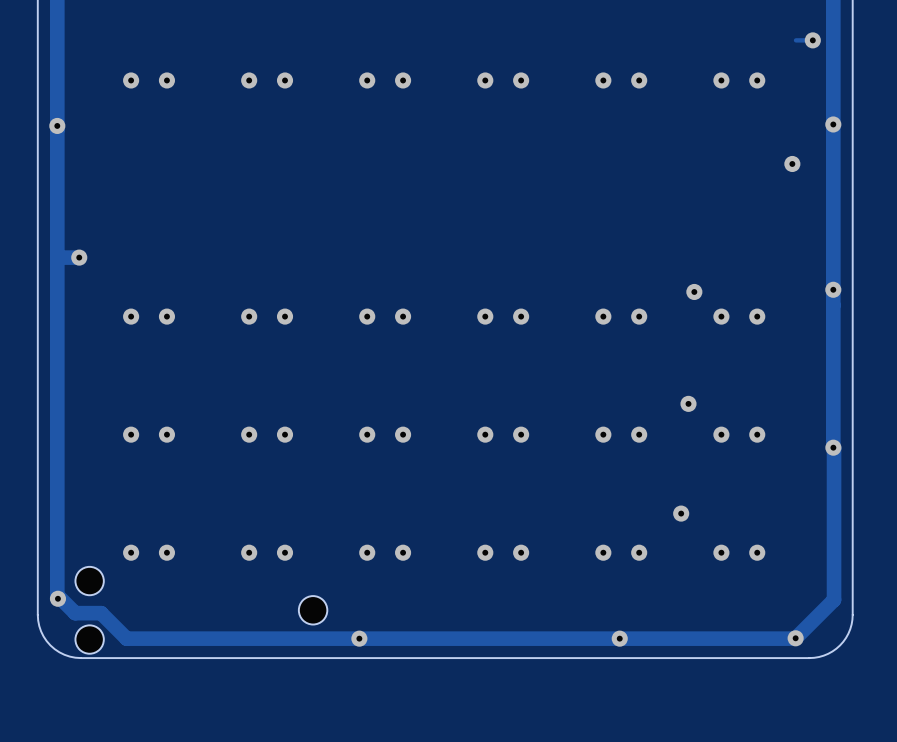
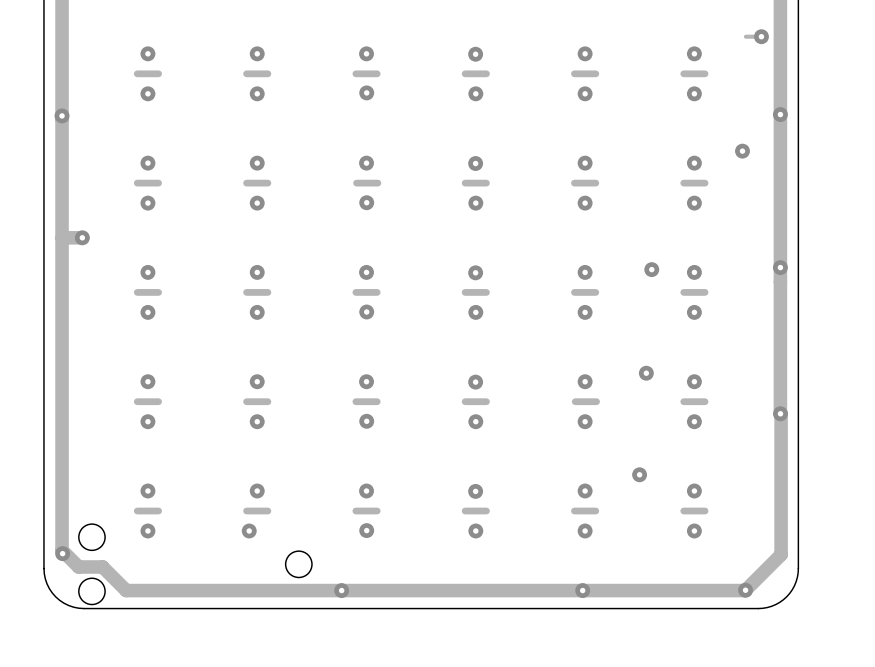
via: none -> (147, 53)
via: none -> (257, 53)
via: none -> (366, 53)
via: none -> (585, 53)
via: none -> (694, 53)
via: none -> (475, 54)
via: (131, 80) -> none
track: none -> (137, 73) (158, 73)
via: (166, 80) -> none
via: (249, 80) -> none
track: none -> (246, 73) (267, 73)
via: (285, 80) -> none
via: (367, 80) -> none
track: none -> (355, 73) (377, 73)
via: (403, 80) -> none
via: (485, 80) -> none
track: none -> (465, 73) (486, 73)
via: (521, 80) -> none
via: (603, 80) -> none
track: none -> (574, 73) (595, 73)
via: (639, 80) -> none
via: (721, 80) -> none
track: none -> (683, 73) (705, 73)
via: (757, 80) -> none
via: none -> (366, 92)
via: none -> (147, 93)
via: none -> (257, 93)
via: none -> (475, 93)
via: none -> (585, 93)
via: none -> (694, 93)
via: none -> (147, 163)
via: none -> (257, 163)
via: none -> (366, 163)
via: none -> (585, 163)
via: none -> (694, 163)
via: none -> (475, 163)
track: none -> (137, 183) (158, 183)
track: none -> (246, 183) (267, 183)
track: none -> (356, 183) (377, 183)
track: none -> (465, 183) (486, 183)
track: none -> (574, 183) (595, 183)
track: none -> (683, 183) (705, 183)
via: none -> (366, 202)
via: none -> (147, 203)
via: none -> (257, 203)
via: none -> (475, 203)
via: none -> (585, 203)
via: none -> (694, 203)
via: none -> (147, 272)
via: none -> (257, 272)
via: none -> (366, 272)
via: none -> (585, 272)
via: none -> (694, 272)
via: none -> (475, 272)
via: (131, 316) -> none
track: none -> (137, 292) (158, 292)
via: (166, 316) -> none
via: (249, 316) -> none
track: none -> (246, 292) (267, 292)
via: (285, 316) -> none
via: (367, 316) -> none
track: none -> (355, 292) (377, 292)
via: (403, 316) -> none
via: (485, 316) -> none
track: none -> (465, 292) (486, 292)
via: (521, 316) -> none
via: (603, 316) -> none
track: none -> (574, 292) (595, 292)
via: (639, 316) -> none
via: (721, 316) -> none
track: none -> (683, 292) (705, 292)
via: (757, 316) -> none
via: none -> (366, 312)
via: none -> (147, 312)
via: none -> (257, 312)
via: none -> (475, 312)
via: none -> (585, 312)
via: none -> (694, 312)
via: none -> (147, 381)
via: none -> (257, 381)
via: none -> (366, 381)
via: none -> (475, 382)
via: none -> (585, 381)
via: none -> (694, 381)
via: (131, 434) -> none
track: none -> (137, 401) (158, 401)
via: (166, 434) -> none
via: (249, 434) -> none
track: none -> (246, 401) (267, 401)
via: (285, 434) -> none
via: (367, 434) -> none
track: none -> (355, 401) (377, 401)
via: (403, 434) -> none
via: (485, 434) -> none
track: none -> (465, 401) (486, 401)
via: (521, 434) -> none
via: (603, 434) -> none
track: none -> (575, 401) (596, 401)
via: (639, 434) -> none
via: (721, 434) -> none
track: none -> (683, 401) (705, 401)
via: (757, 434) -> none
via: none -> (366, 421)
via: none -> (147, 421)
via: none -> (257, 421)
via: none -> (475, 421)
via: none -> (585, 421)
via: none -> (694, 421)
via: none -> (147, 491)
via: none -> (257, 491)
via: none -> (366, 491)
via: none -> (475, 491)
via: none -> (585, 491)
via: none -> (694, 491)
via: (131, 552) -> none
track: none -> (137, 511) (158, 511)
via: (166, 552) -> none
via: (249, 552) -> none
track: none -> (246, 511) (267, 511)
via: (285, 552) -> none
via: (367, 552) -> none
track: none -> (355, 511) (377, 511)
via: (403, 552) -> none
via: (485, 552) -> none
track: none -> (465, 511) (486, 511)
via: (521, 552) -> none
via: (603, 552) -> none
track: none -> (574, 511) (595, 511)
via: (639, 552) -> none
via: (721, 552) -> none
track: none -> (683, 511) (705, 511)
via: (757, 552) -> none
via: none -> (366, 530)
via: none -> (147, 530)
via: none -> (249, 530)
via: none -> (475, 530)
via: none -> (585, 530)
via: none -> (694, 530)

